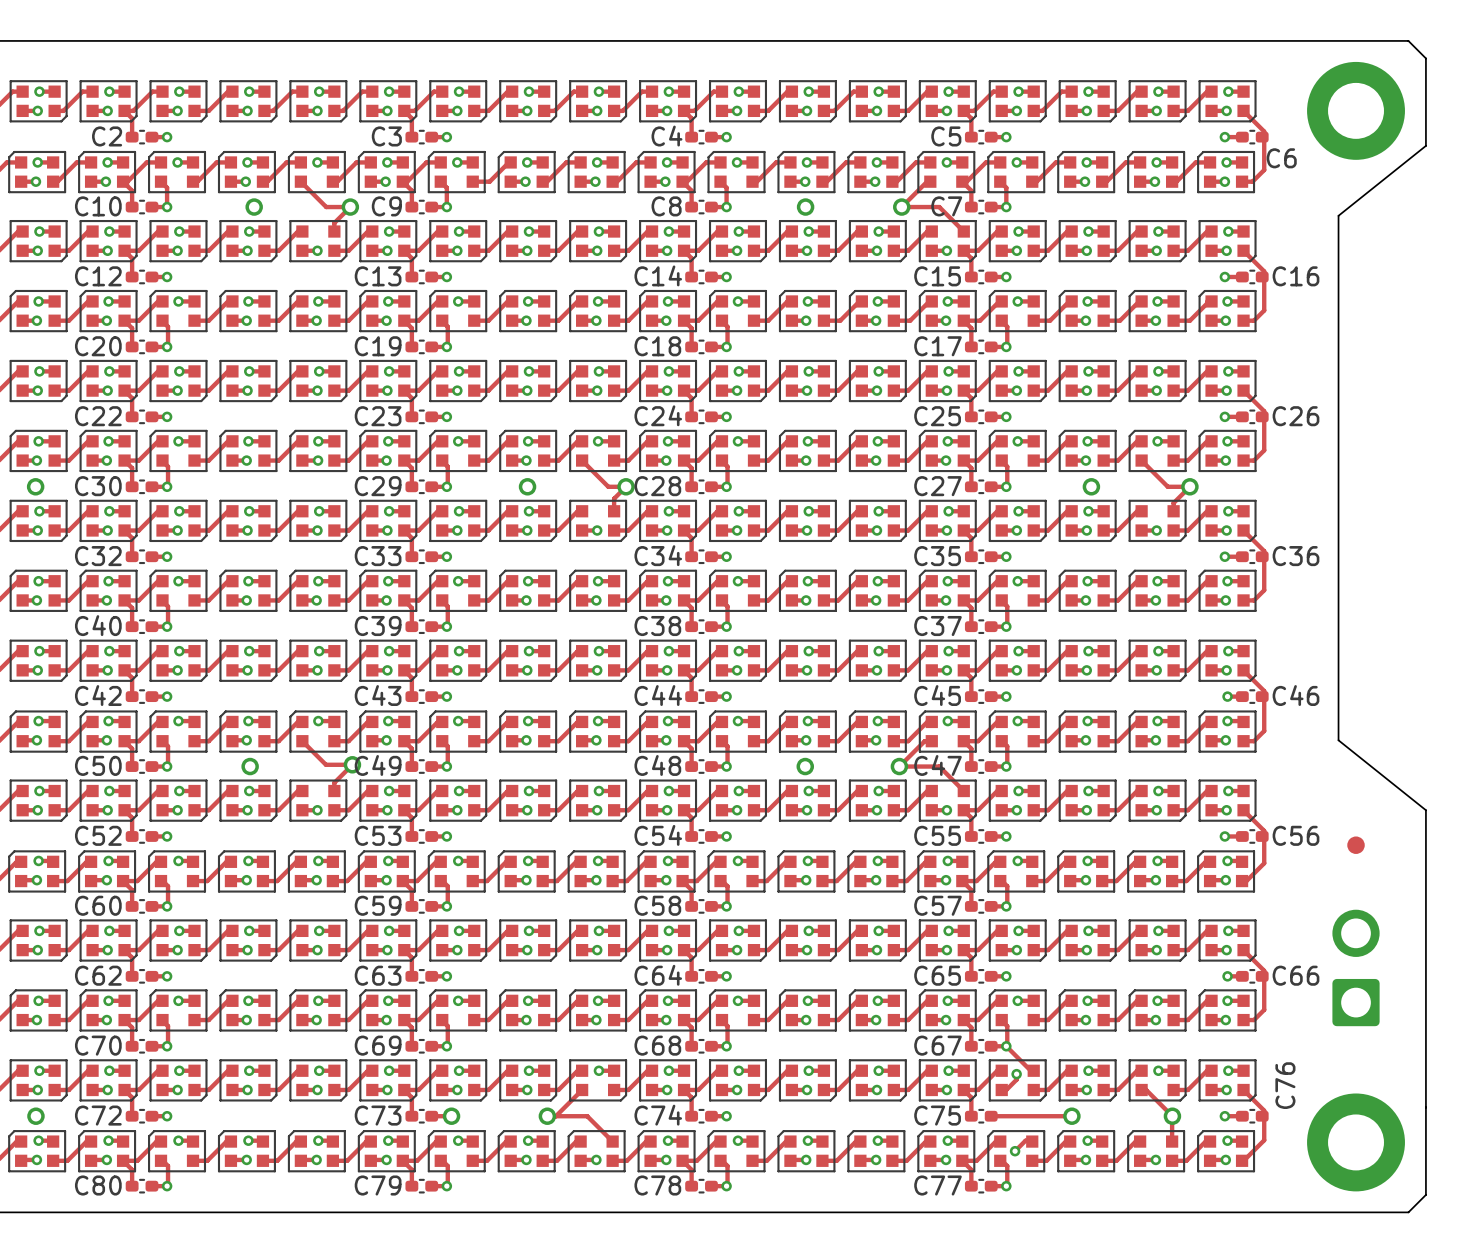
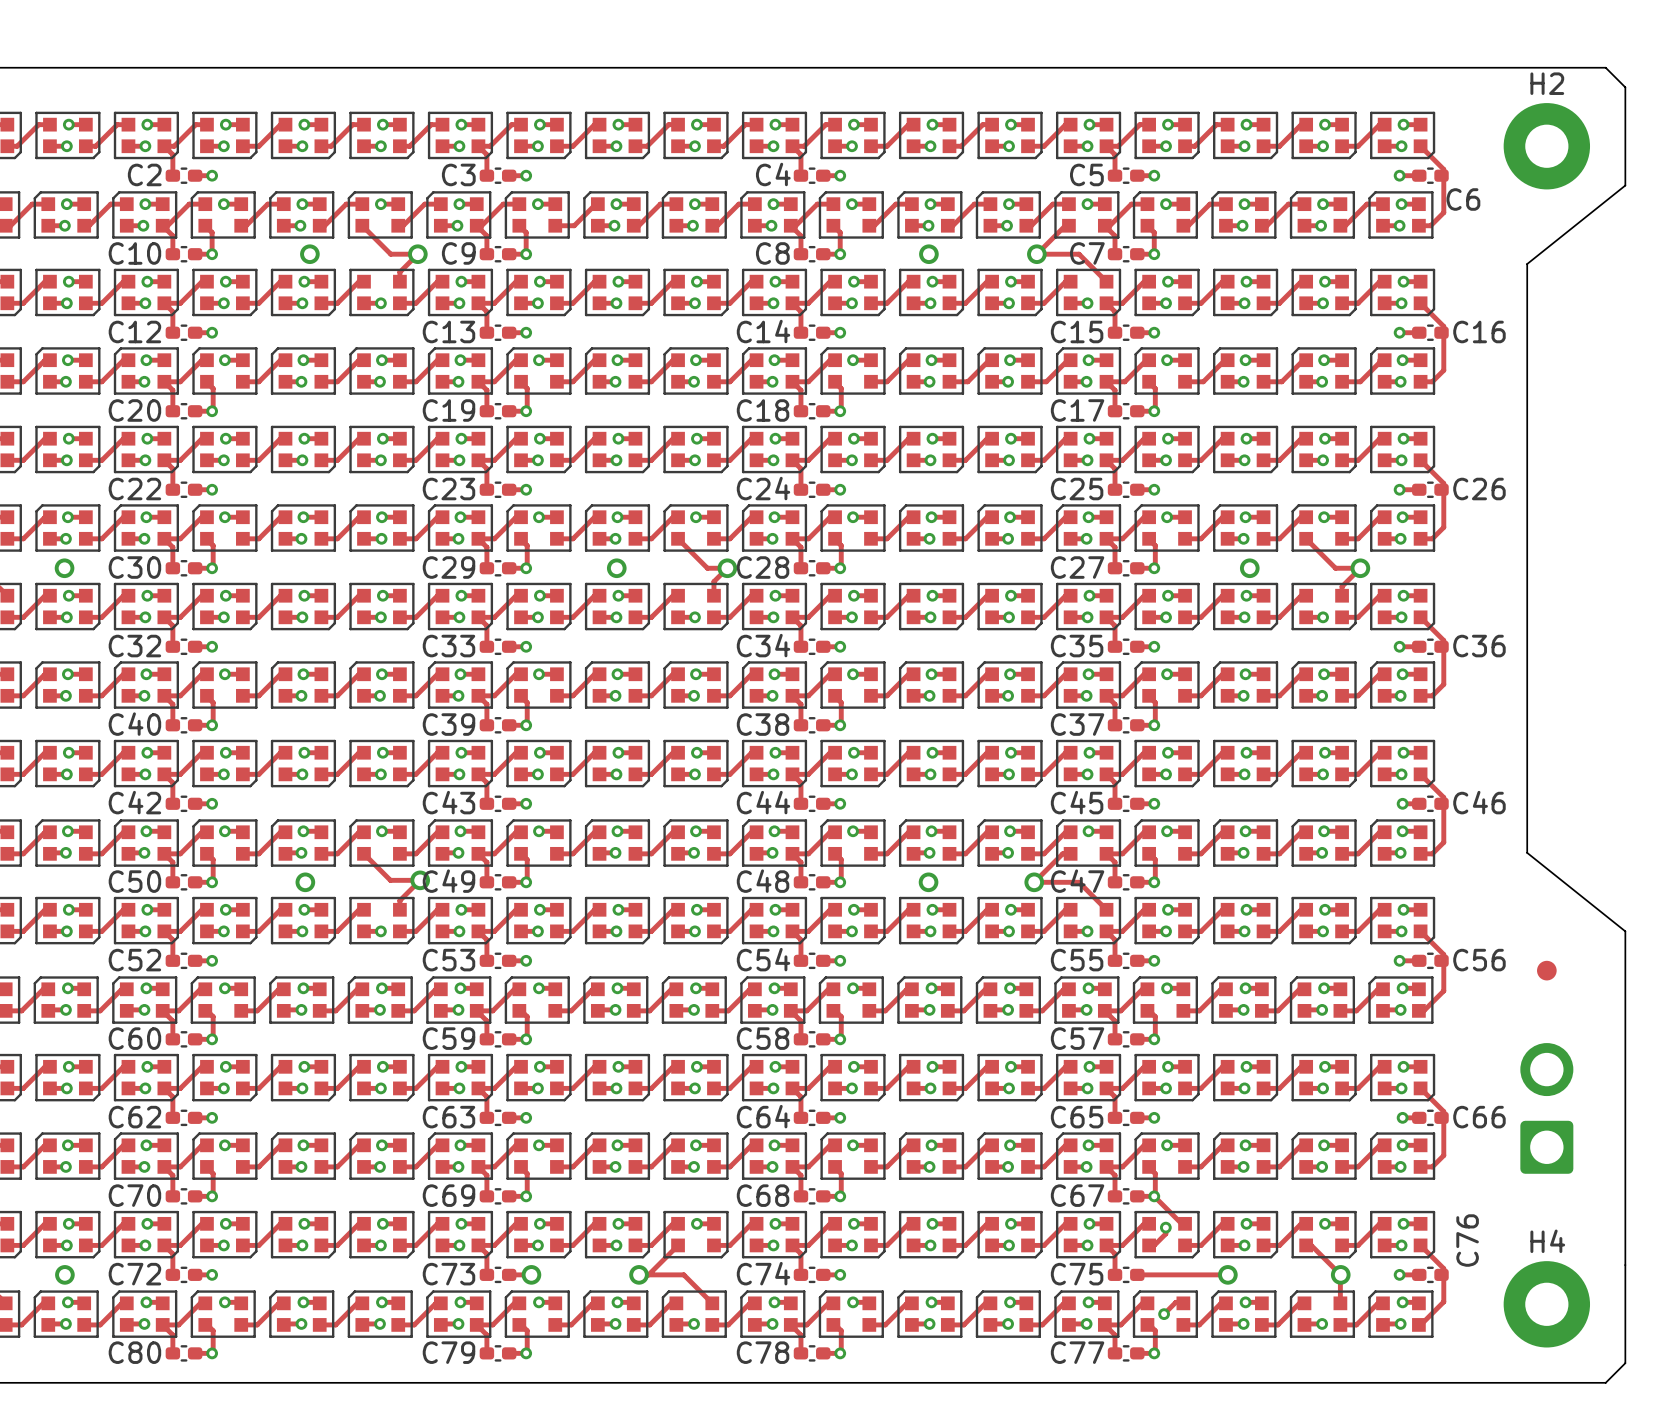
part: (1356, 110) -> none
H2: none -> (1546, 146)
part: (1356, 1142) -> none
H4: none -> (1546, 1304)

